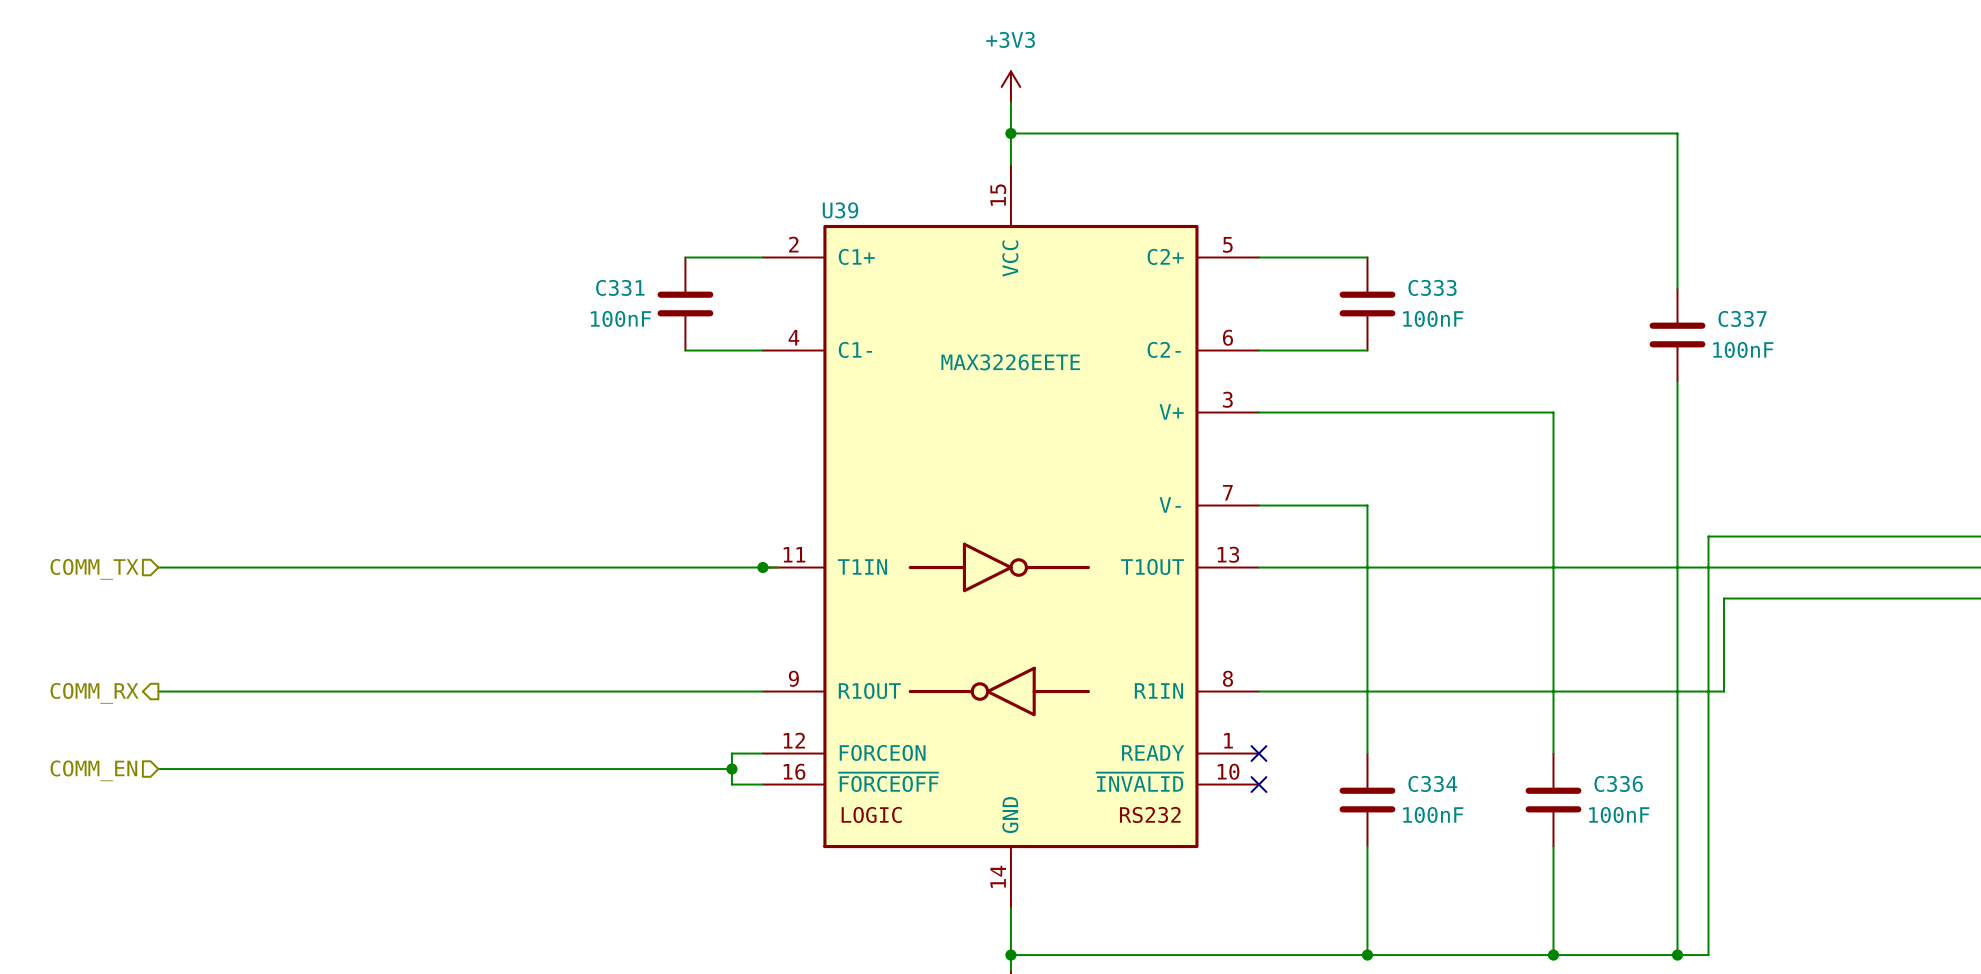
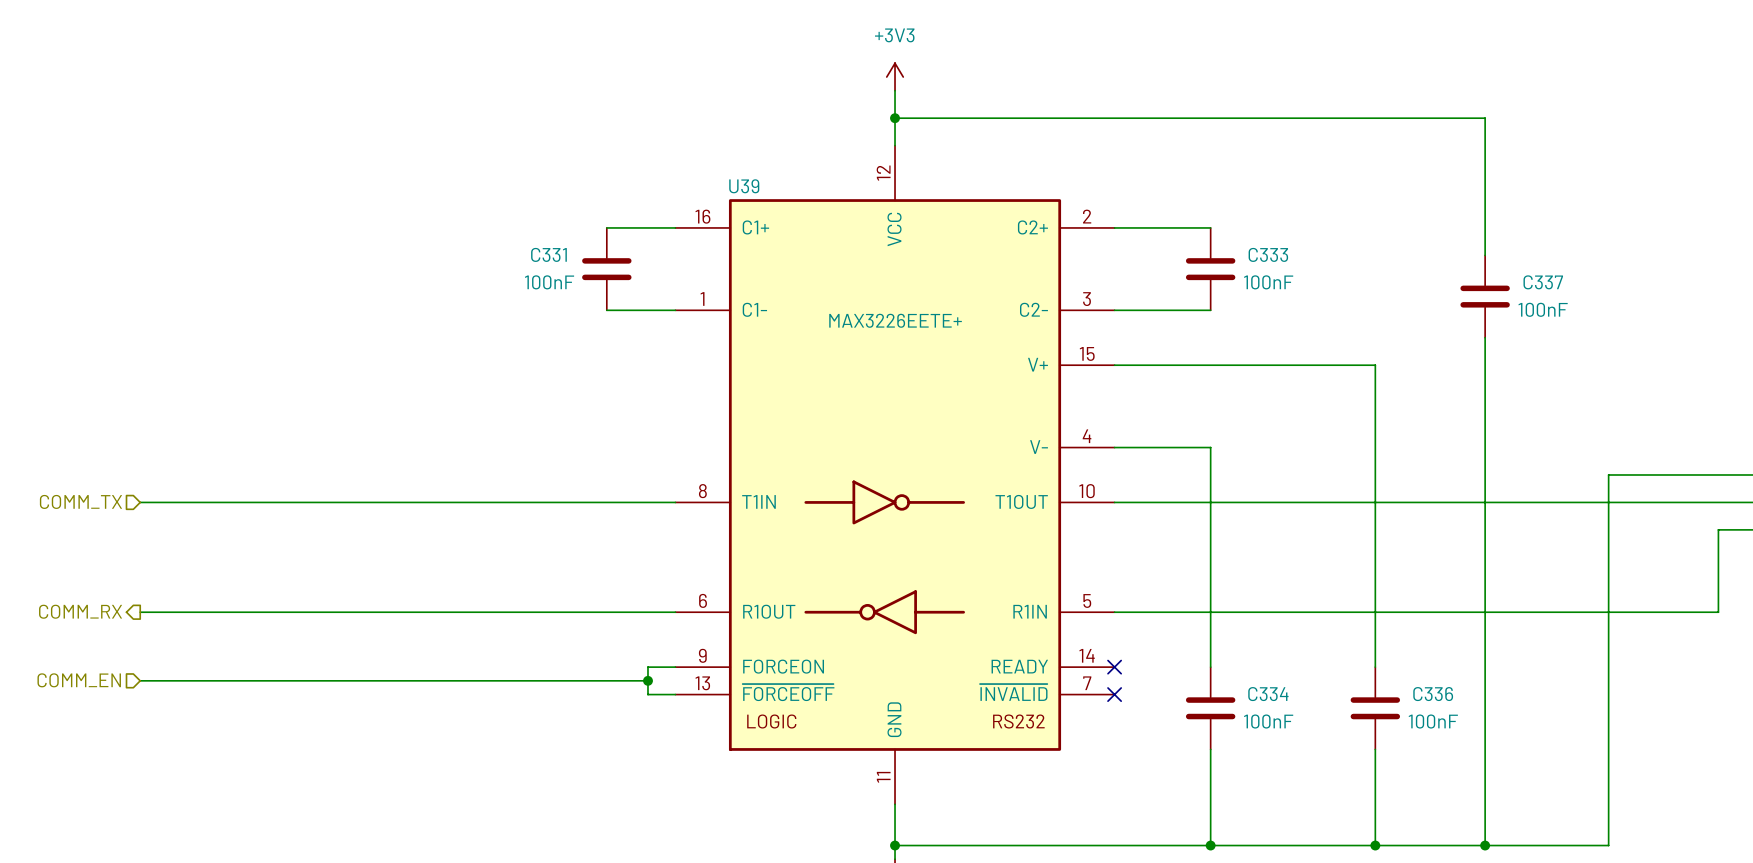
U39 symbol: [762, 164, 1259, 909] -> [675, 145, 1115, 805]
U39 value: MAX3226EETE (1010, 362) -> MAX3226EETE+ (895, 320)
wire: (1817, 536) (1708, 536) (1708, 955) -> (1608, 474) (1608, 845) (1512, 845)
junction: (762, 567) -> none
wire: (1941, 598) (1724, 598) (1724, 691) -> (1718, 529) (1718, 612) (1526, 612)

